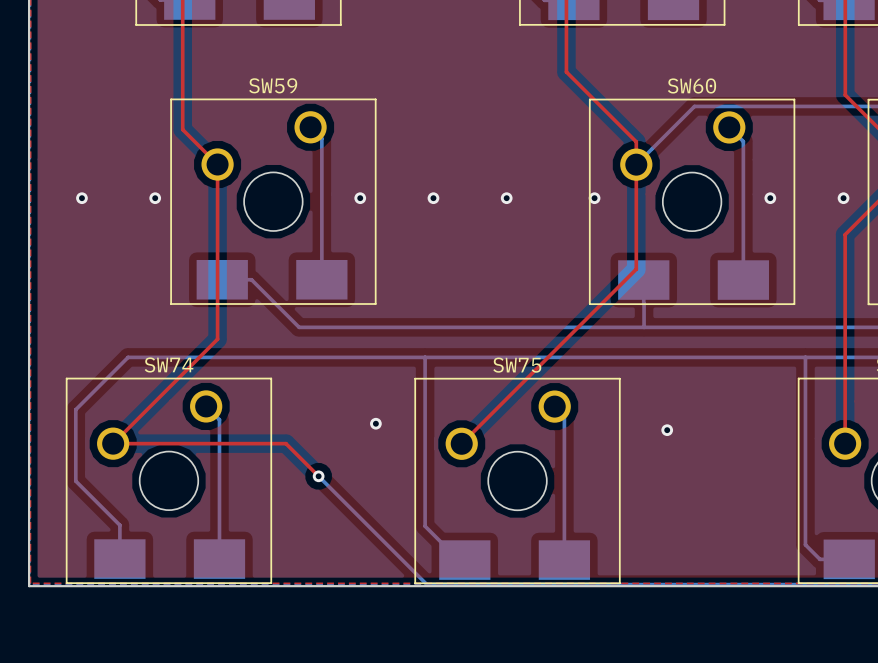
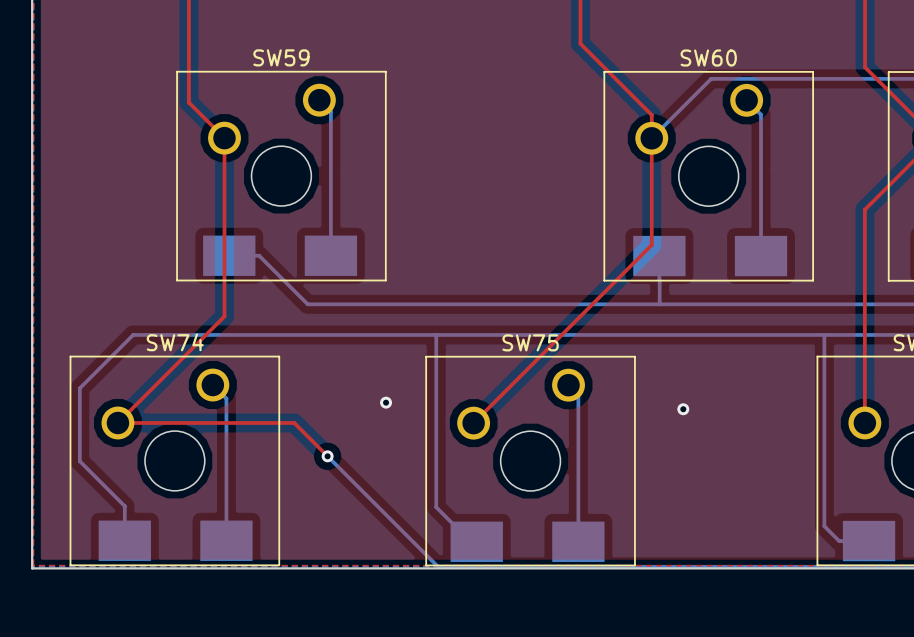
via: (81, 198) -> none
via: (155, 198) -> none
via: (360, 198) -> none
via: (433, 198) -> none
via: (506, 198) -> none
via: (594, 198) -> none
via: (770, 198) -> none
via: (843, 198) -> none

